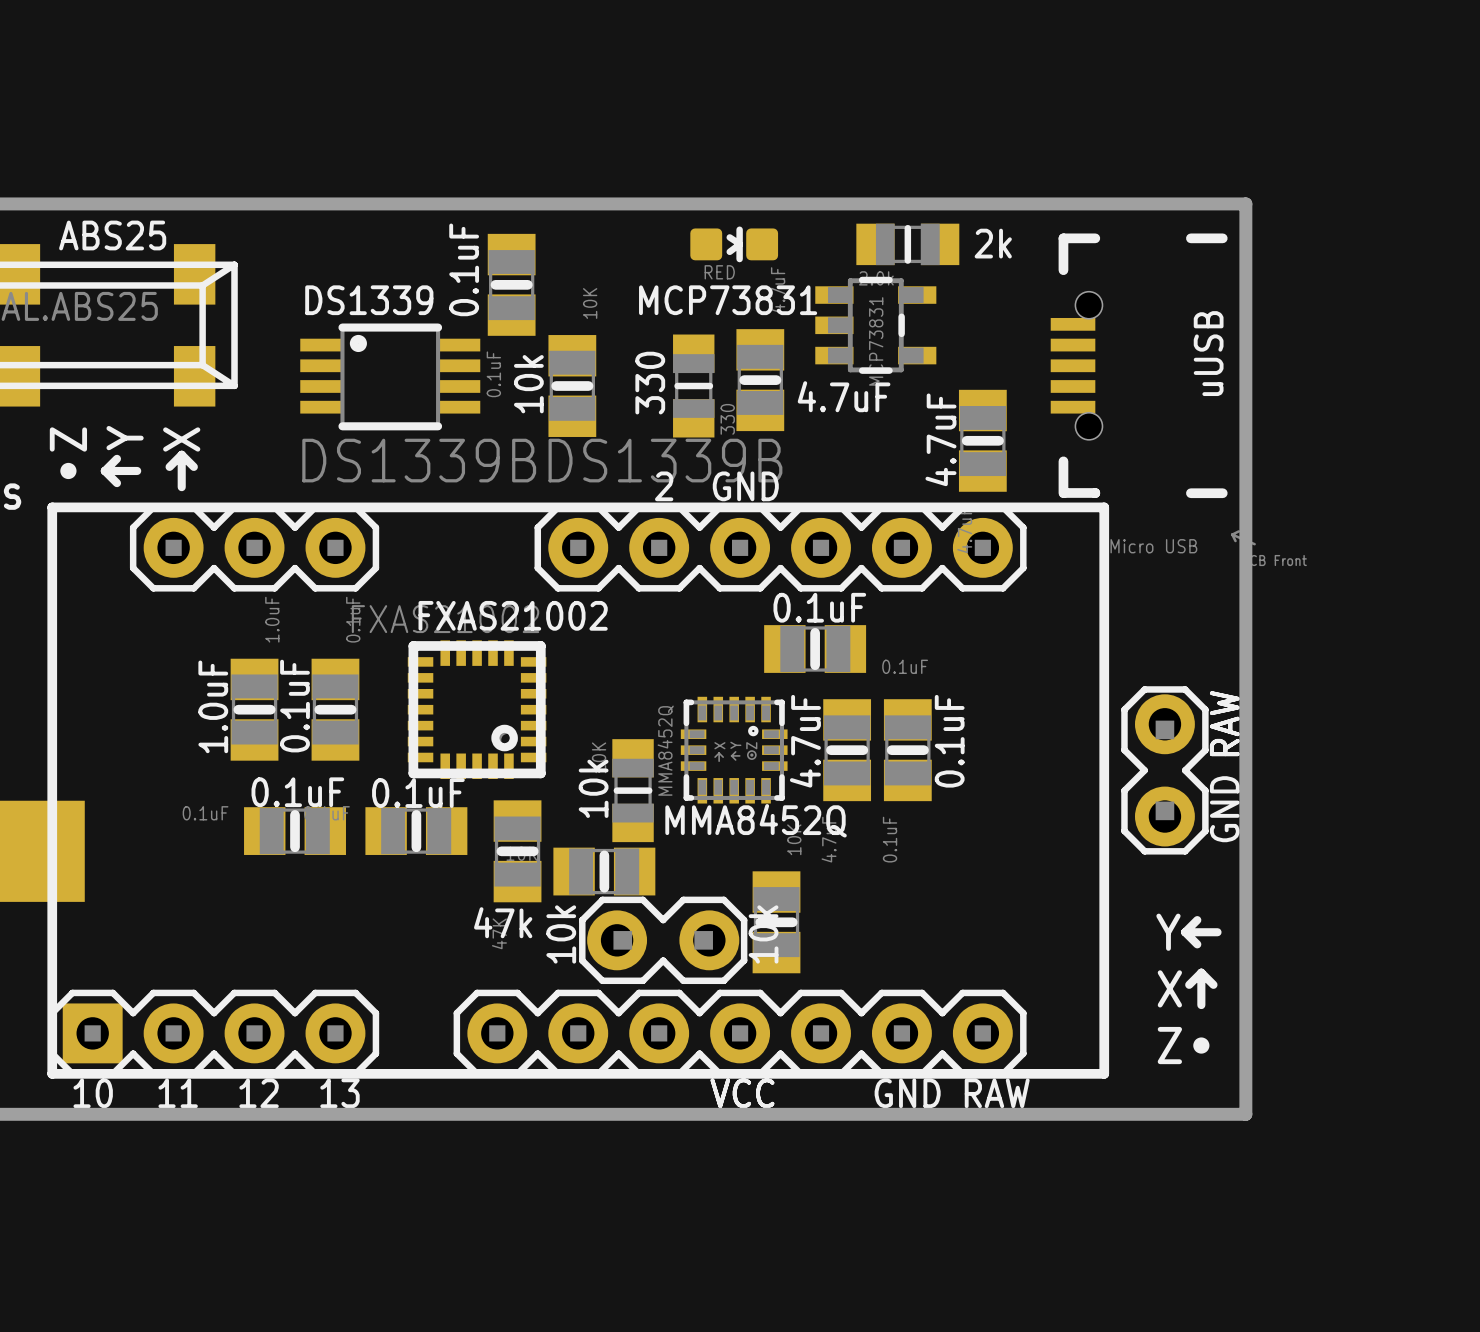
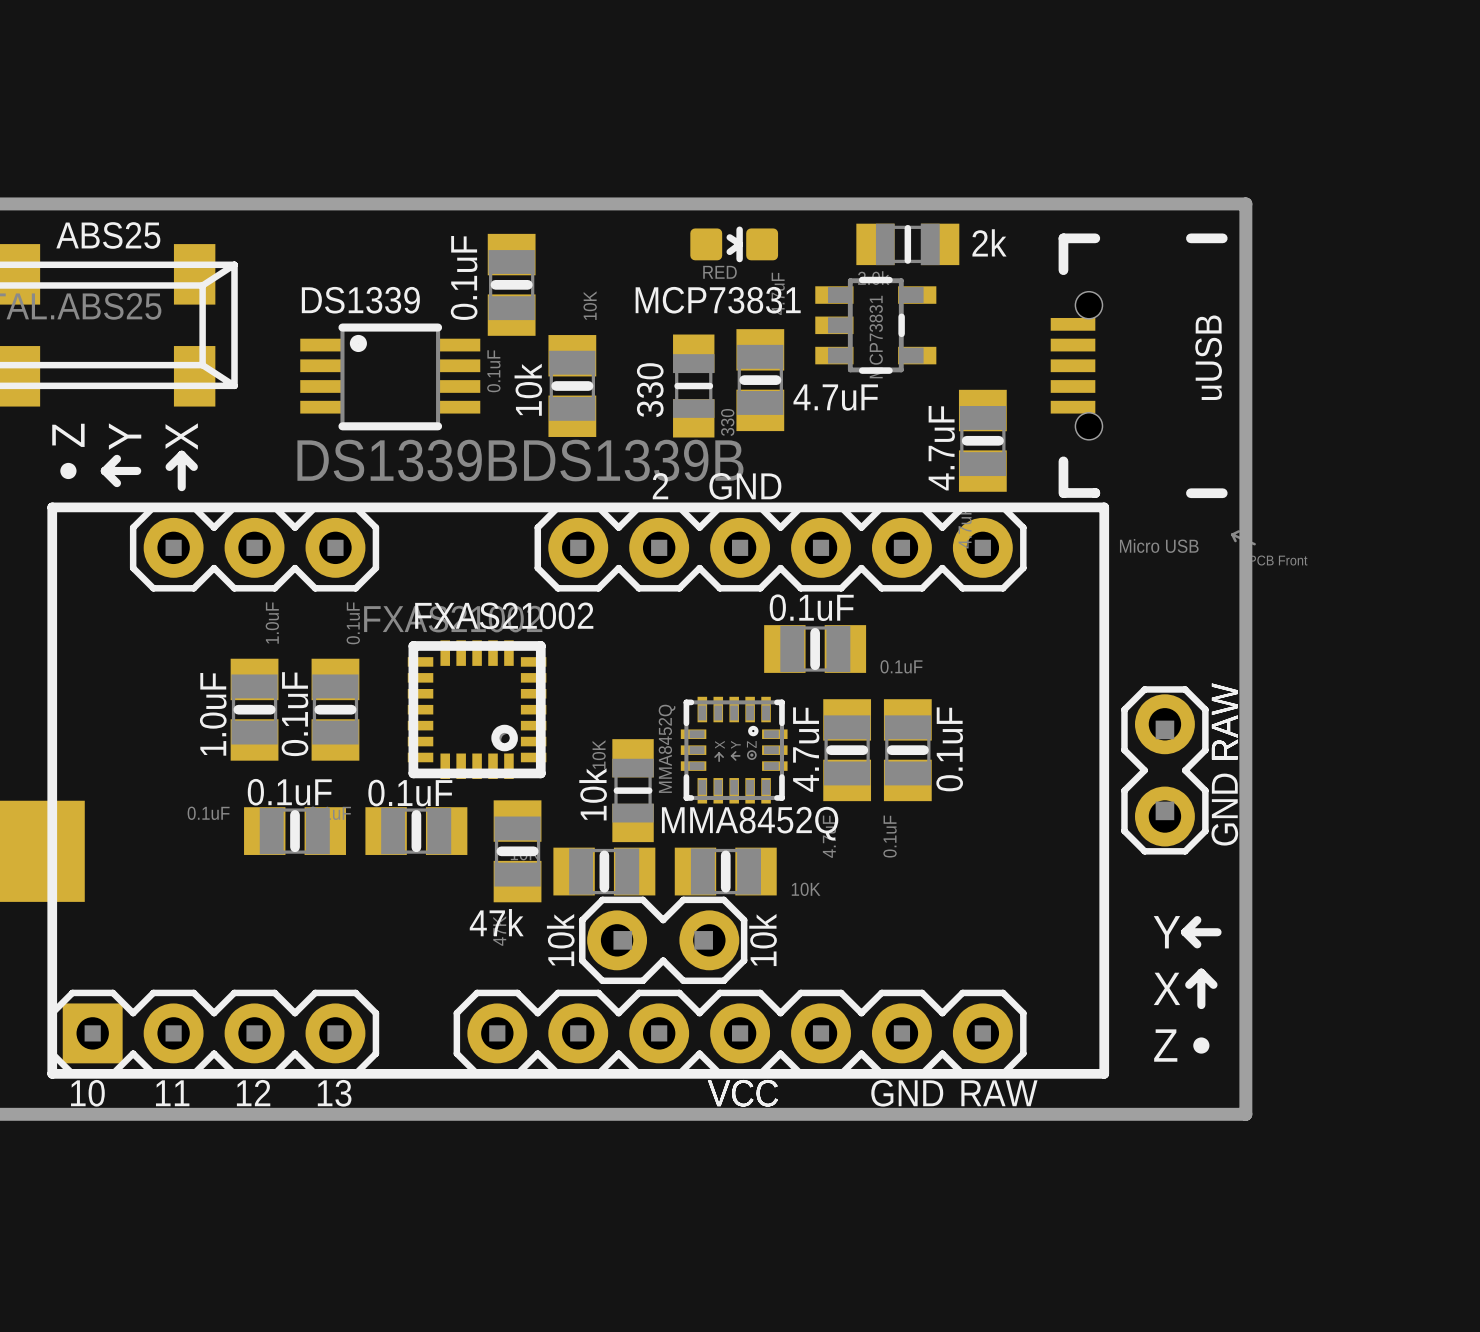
part rotation: 0° (776, 922) -> 90° clockwise (725, 871)
part position: (776, 922) -> (725, 871)

